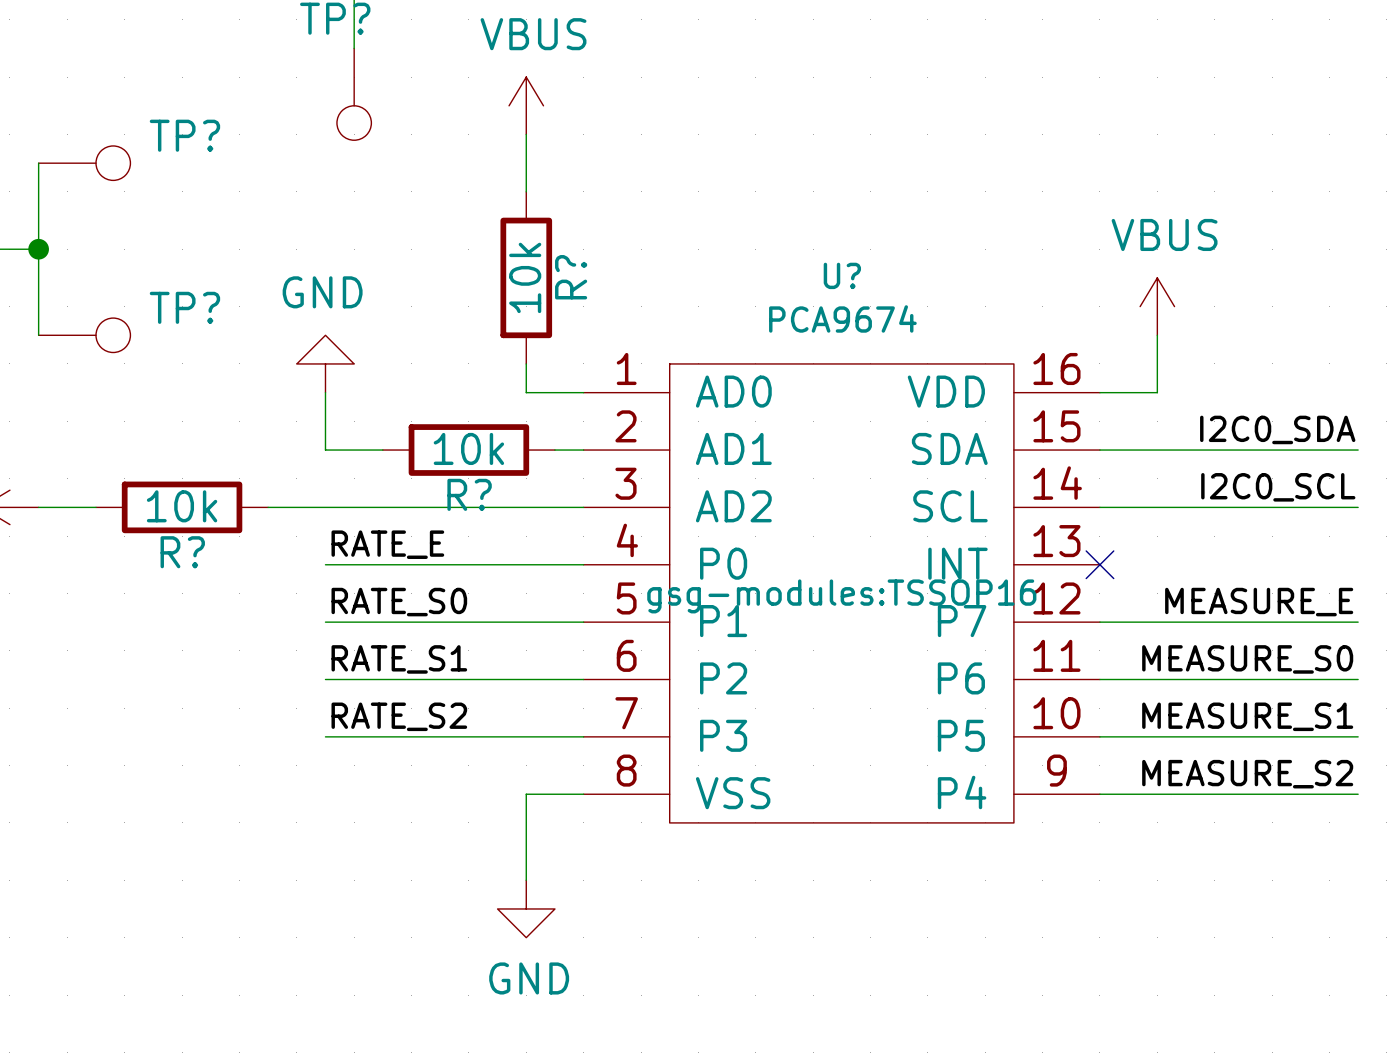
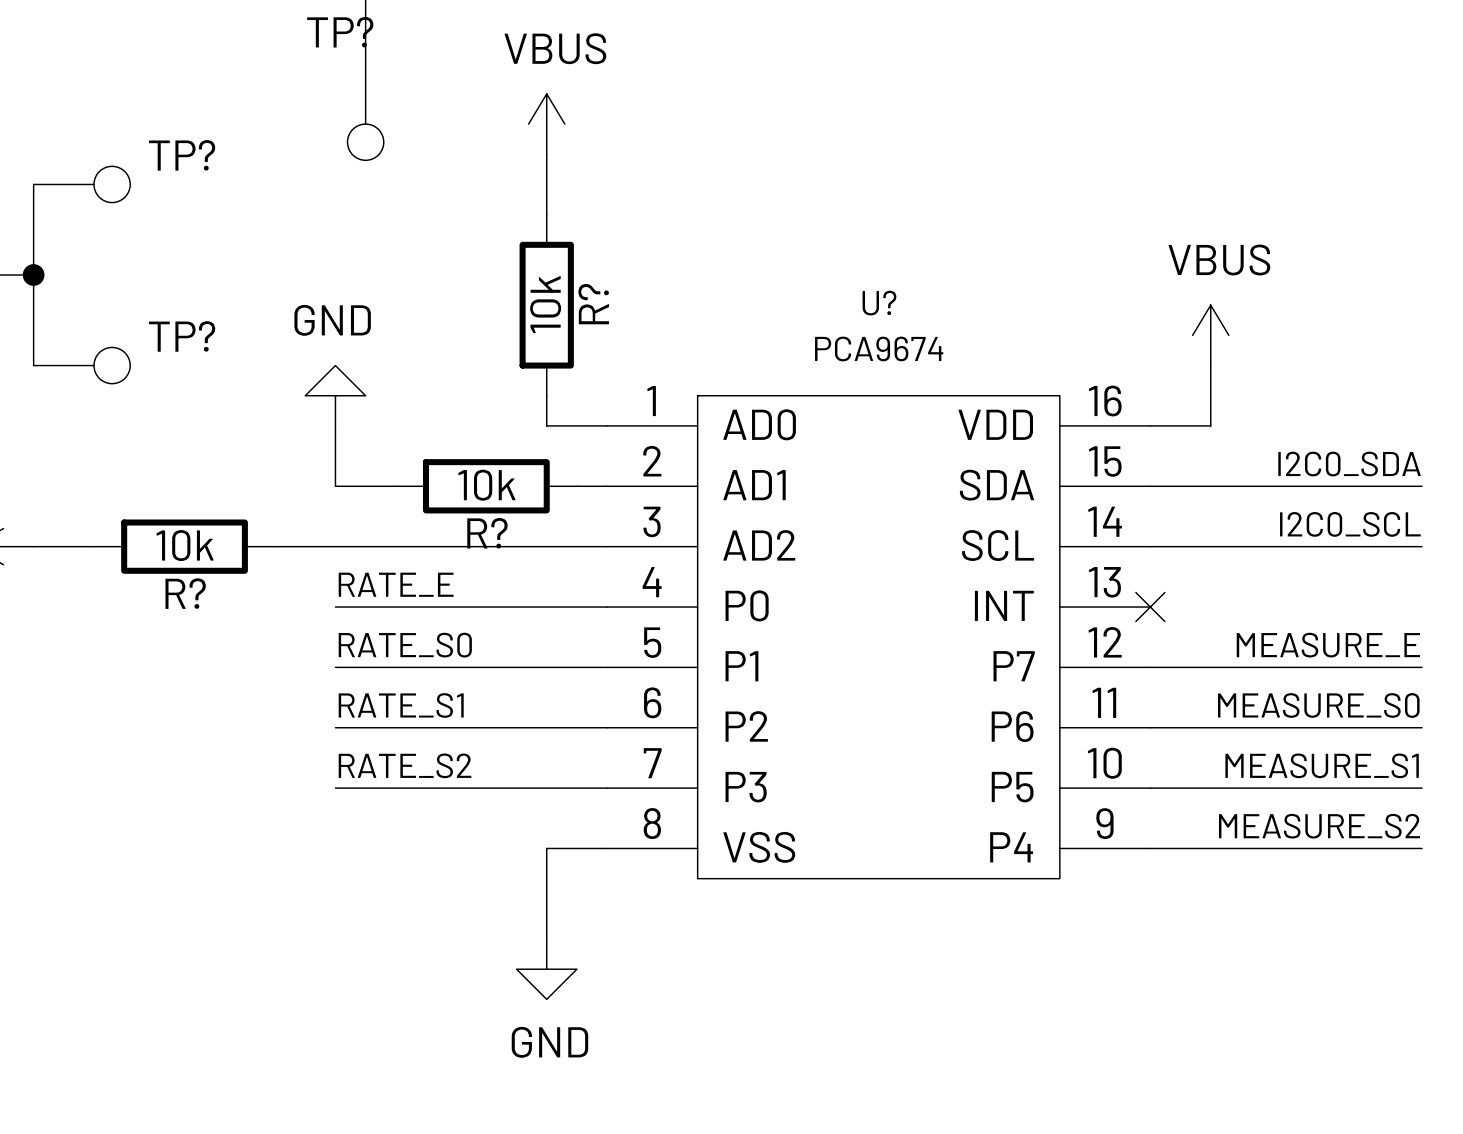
U? text: gsg-modules:TSSOP16 (841, 596) -> none

